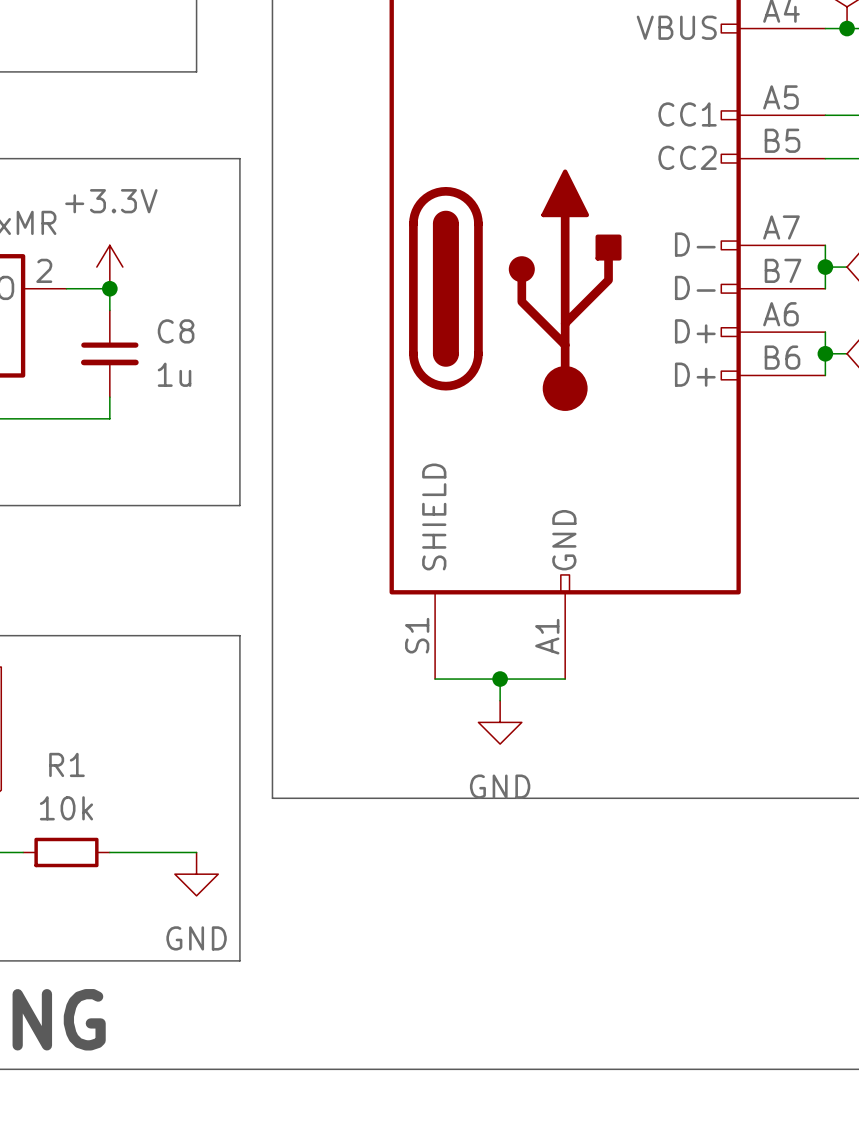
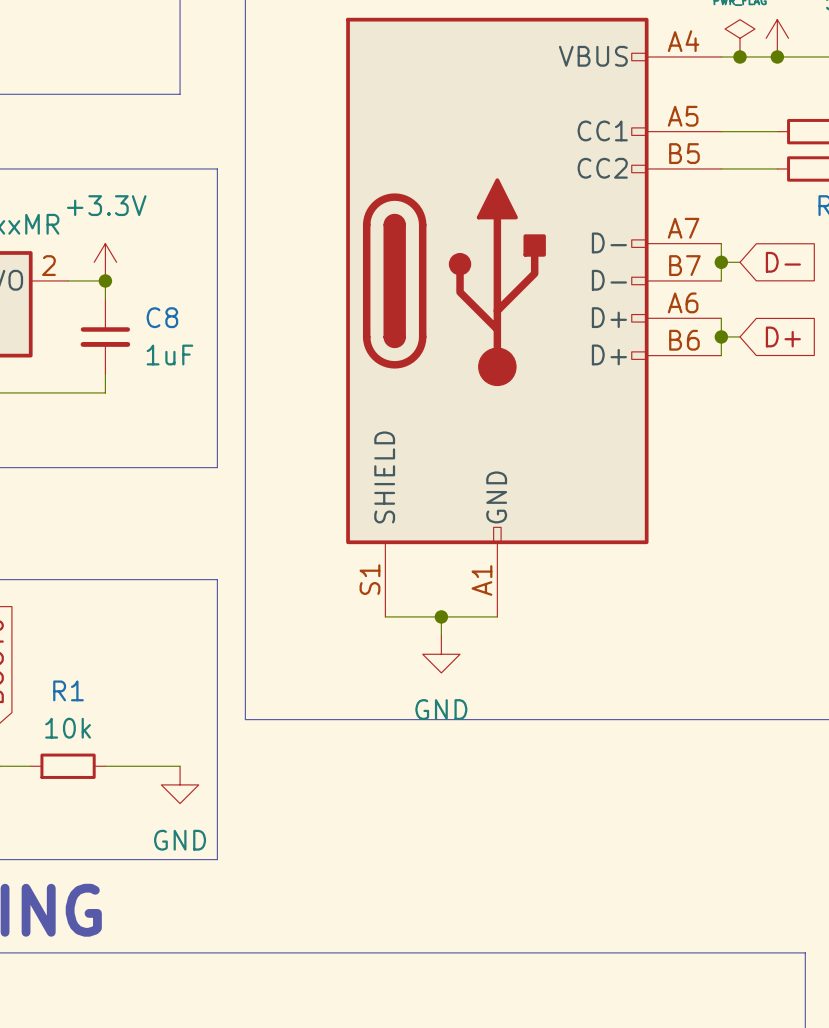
C8 value: 1u (174, 374) -> 1uF (169, 355)

